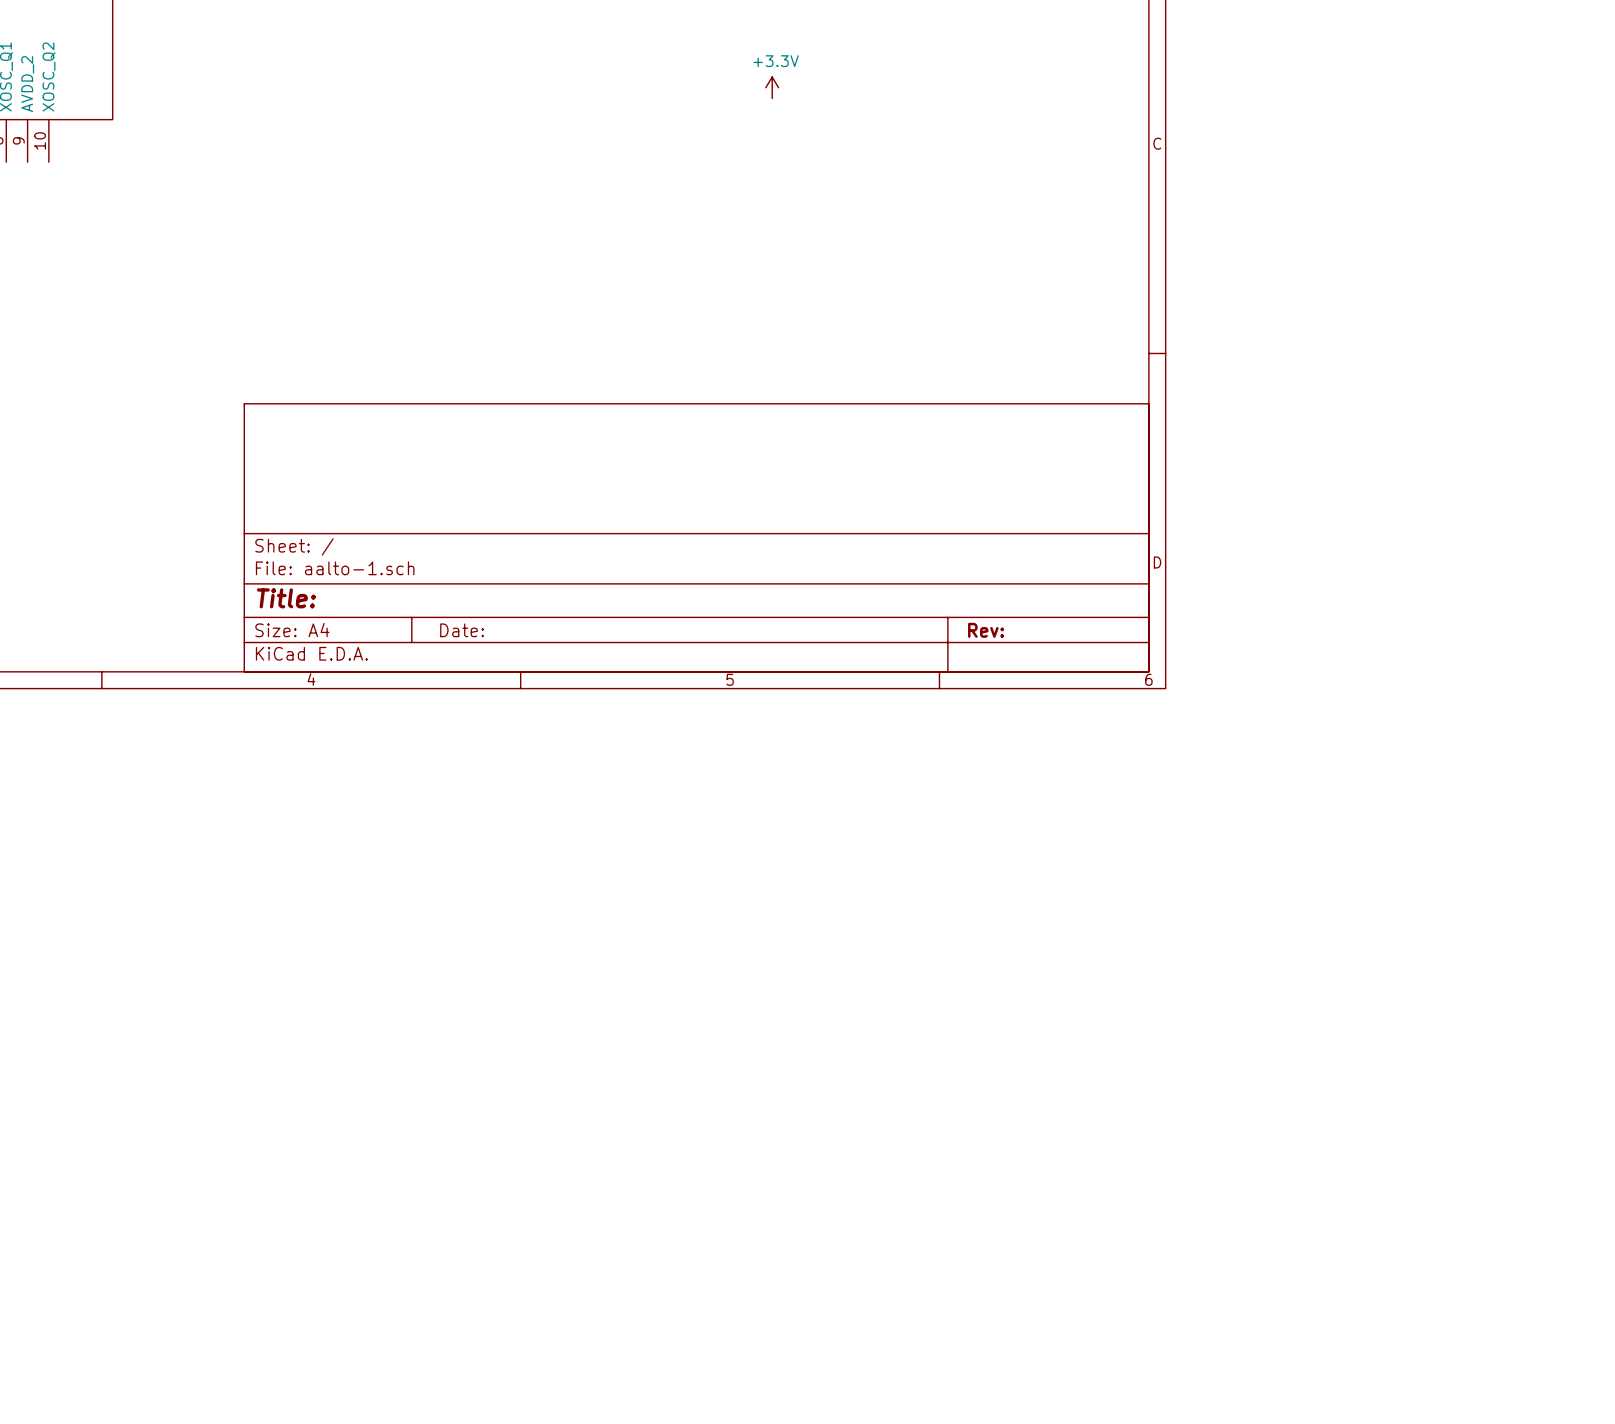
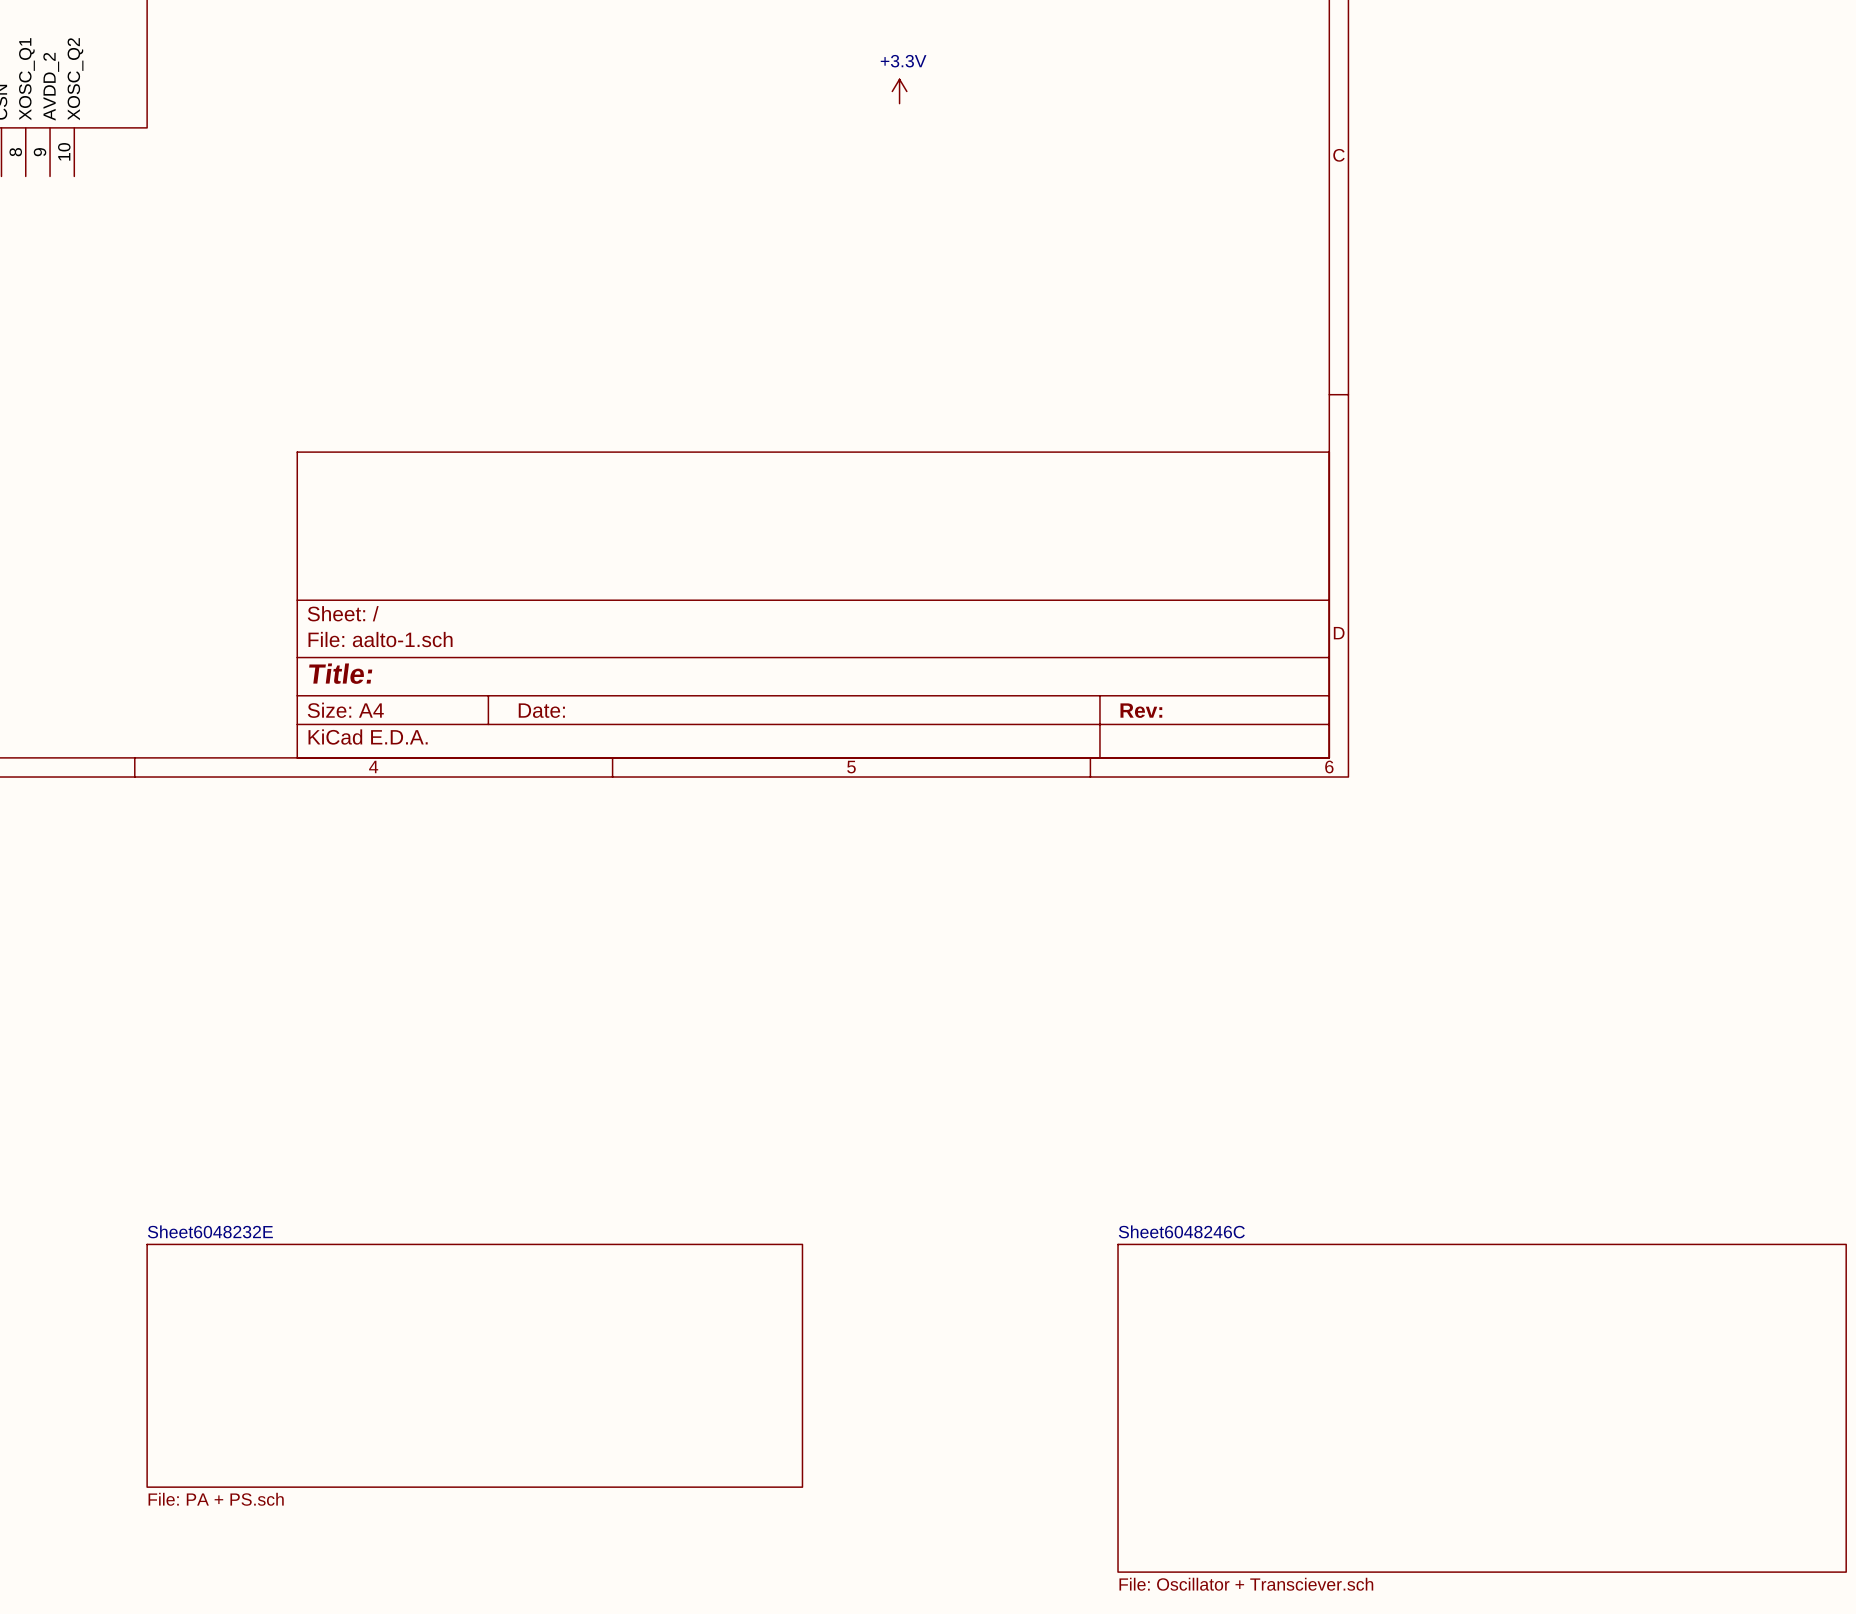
sheet Sheet6048232E: none -> File: PA + PS.sch (474, 1365)
sheet Sheet6048246C: none -> File: Oscillator + Transciever.sch (1482, 1408)

